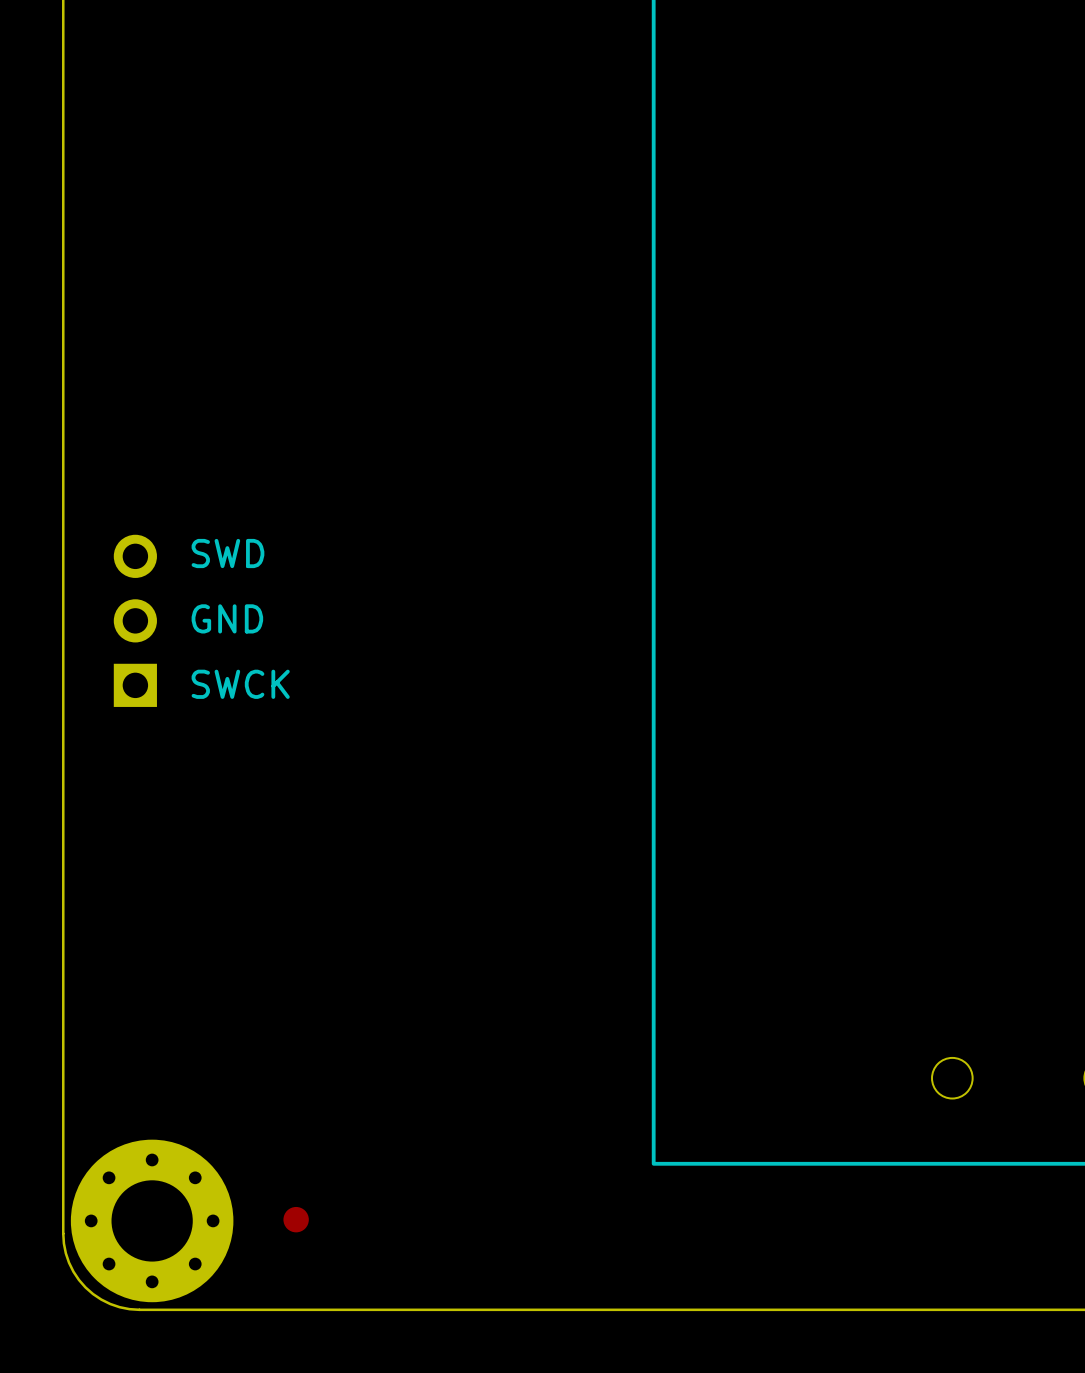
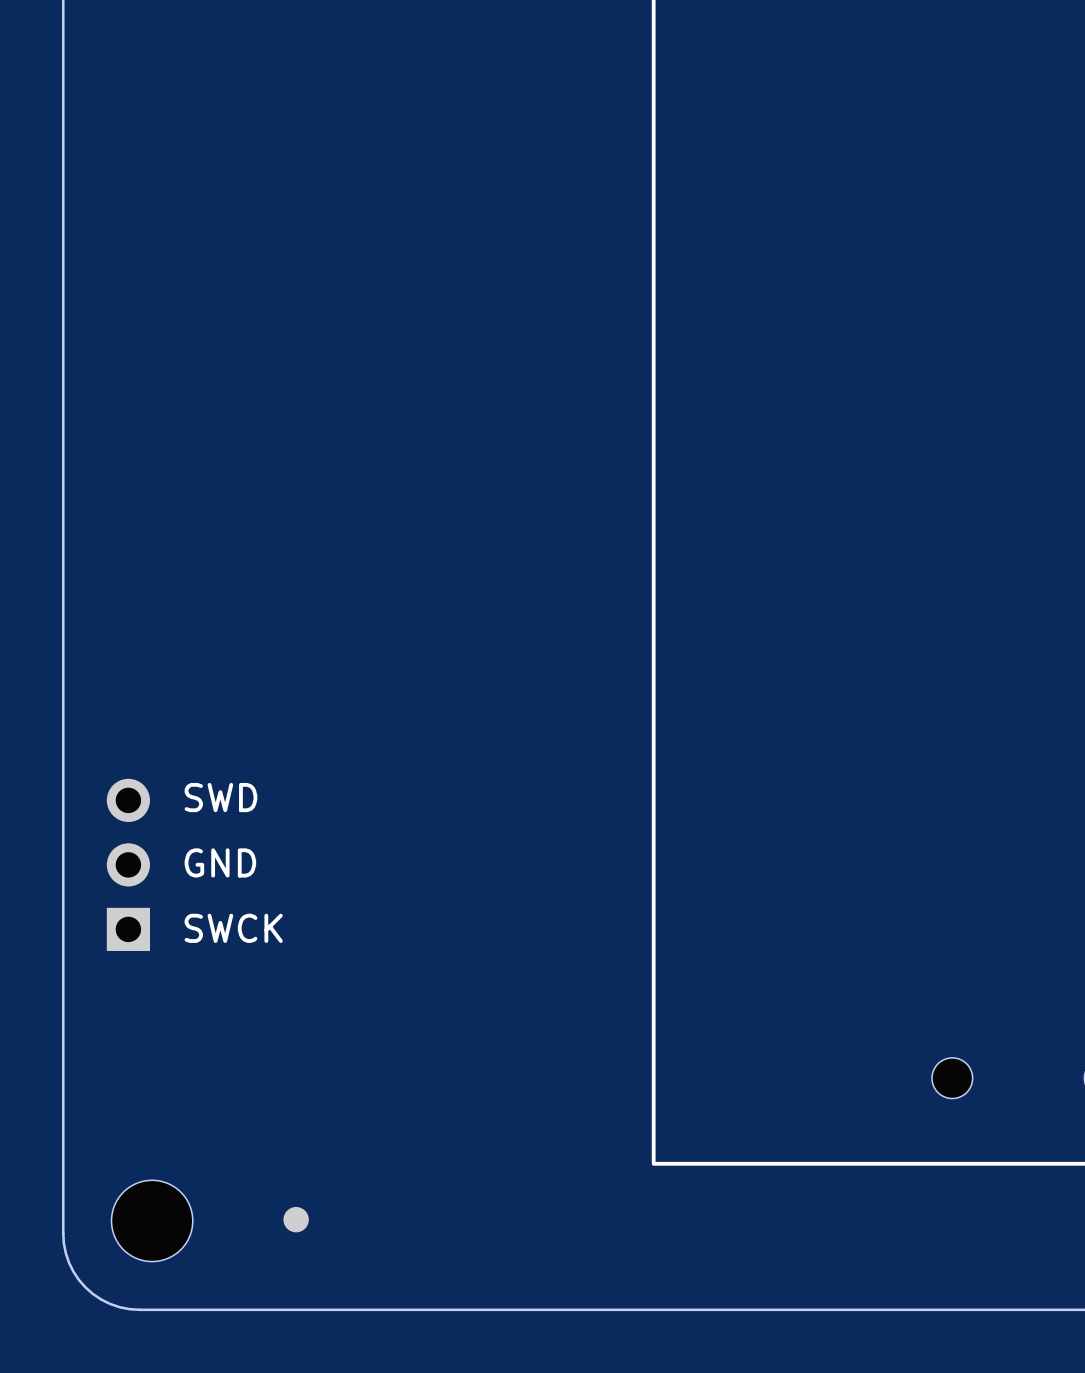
text position: SWD (227, 553) -> SWD (220, 797)
text position: GND (227, 618) -> GND (220, 862)
part position: (135, 620) -> (128, 864)
text position: SWCK (240, 684) -> SWCK (233, 928)
part footprint: [70, 1139, 234, 1303] -> [111, 1180, 193, 1262]

